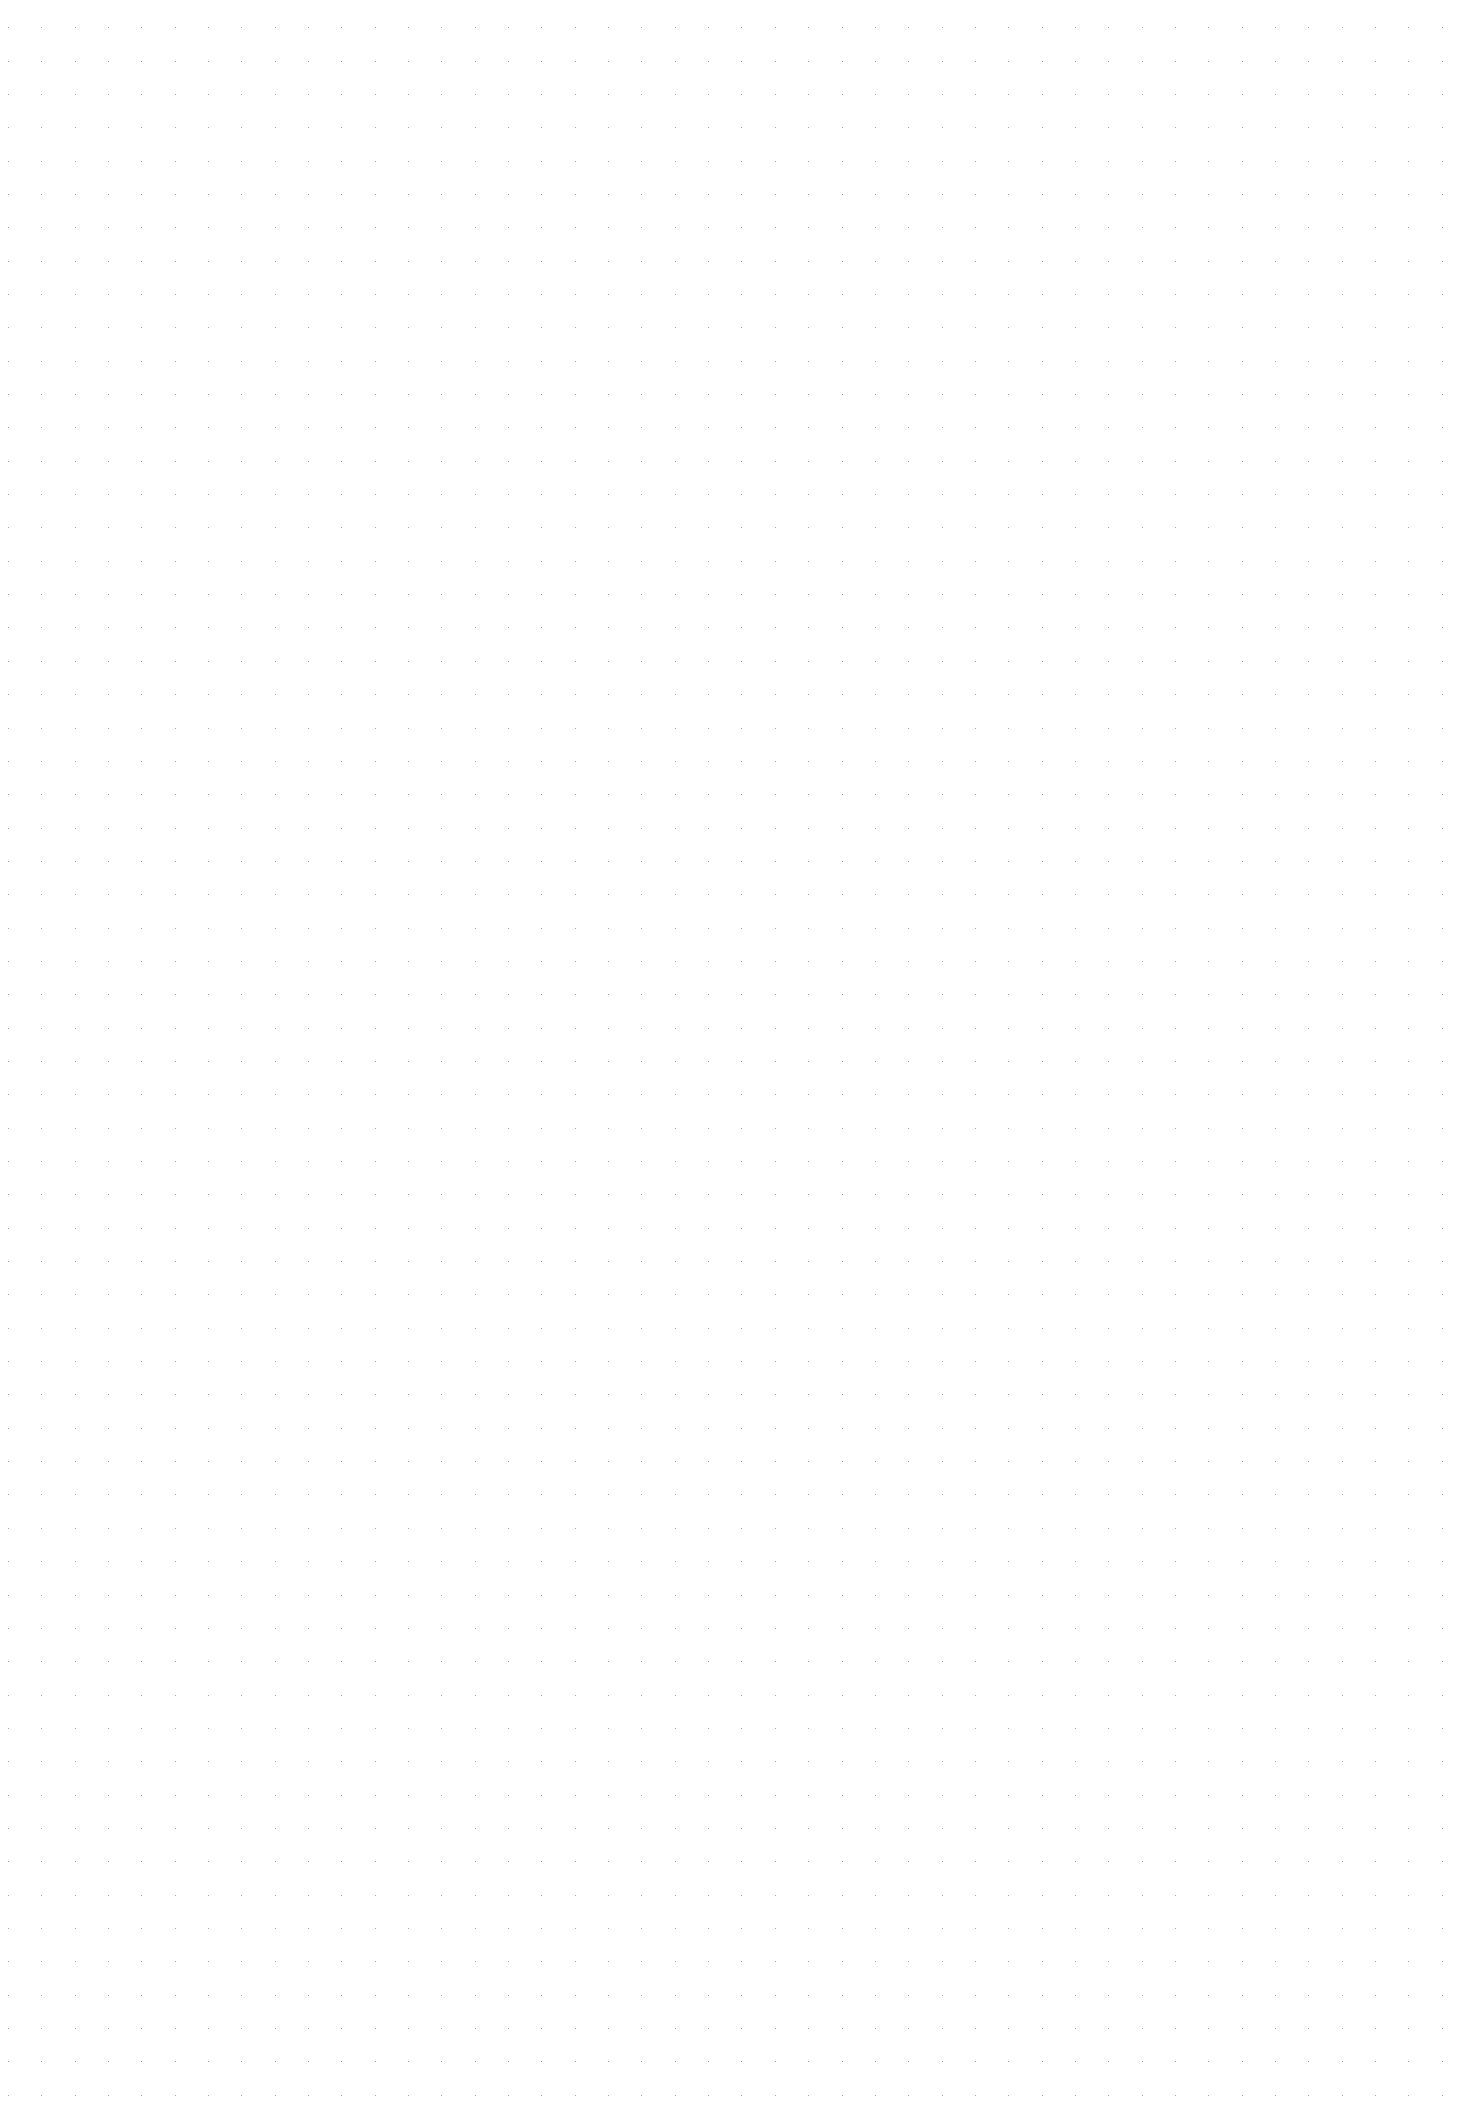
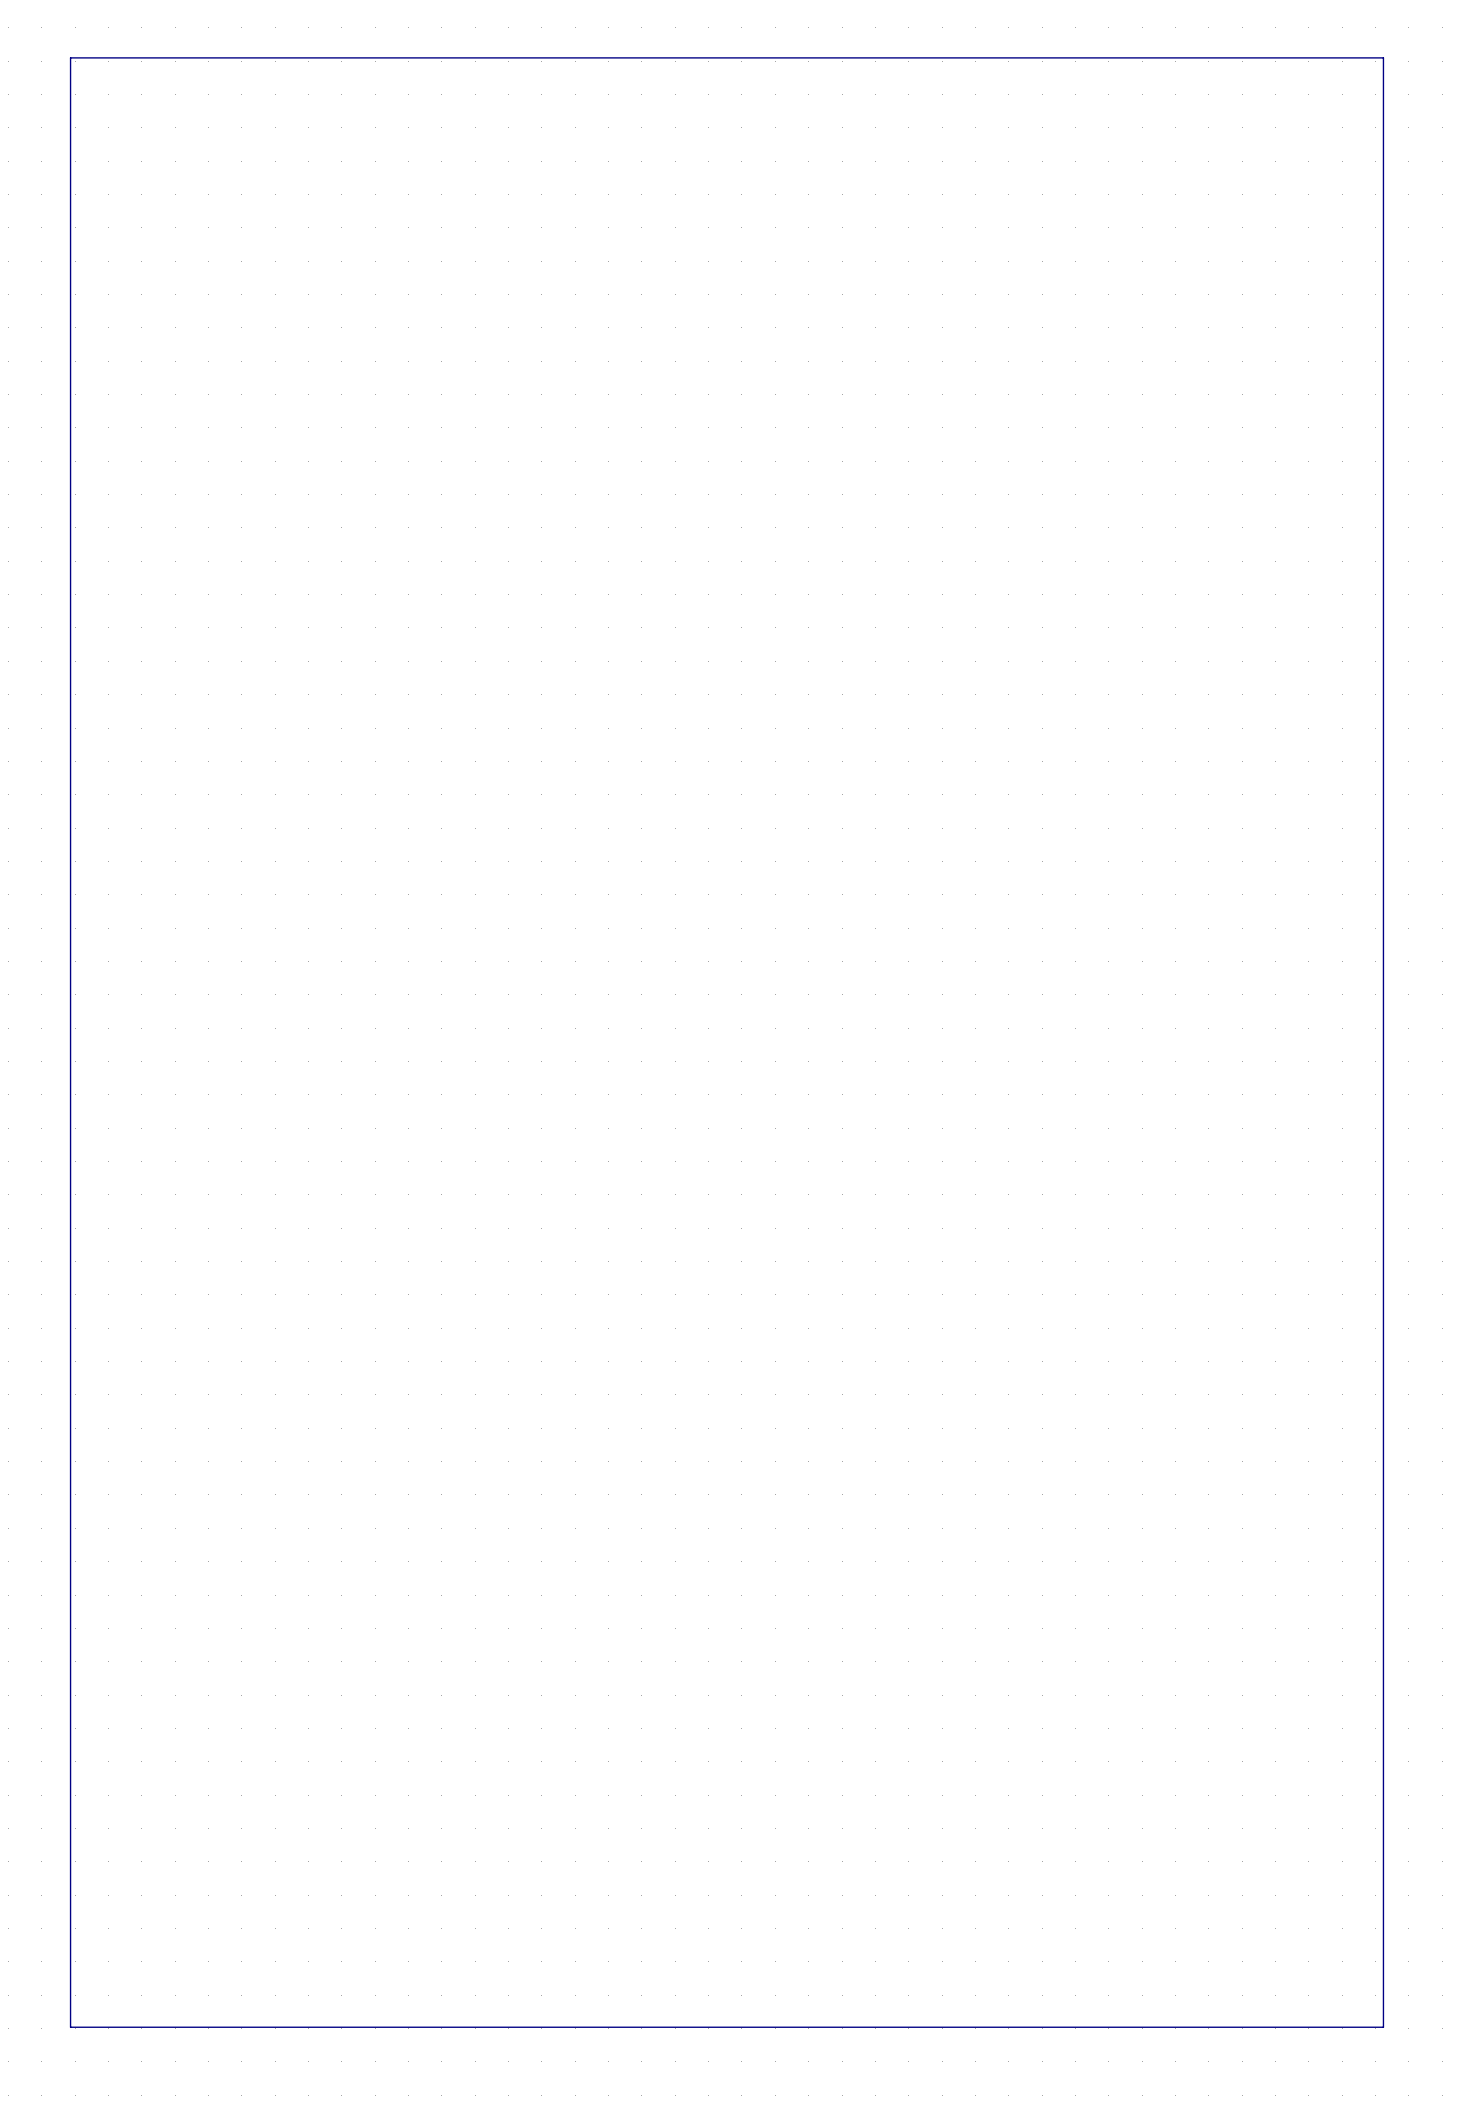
line: none -> (70, 57) (1383, 57) (1383, 2027) (70, 2027) (70, 57)

